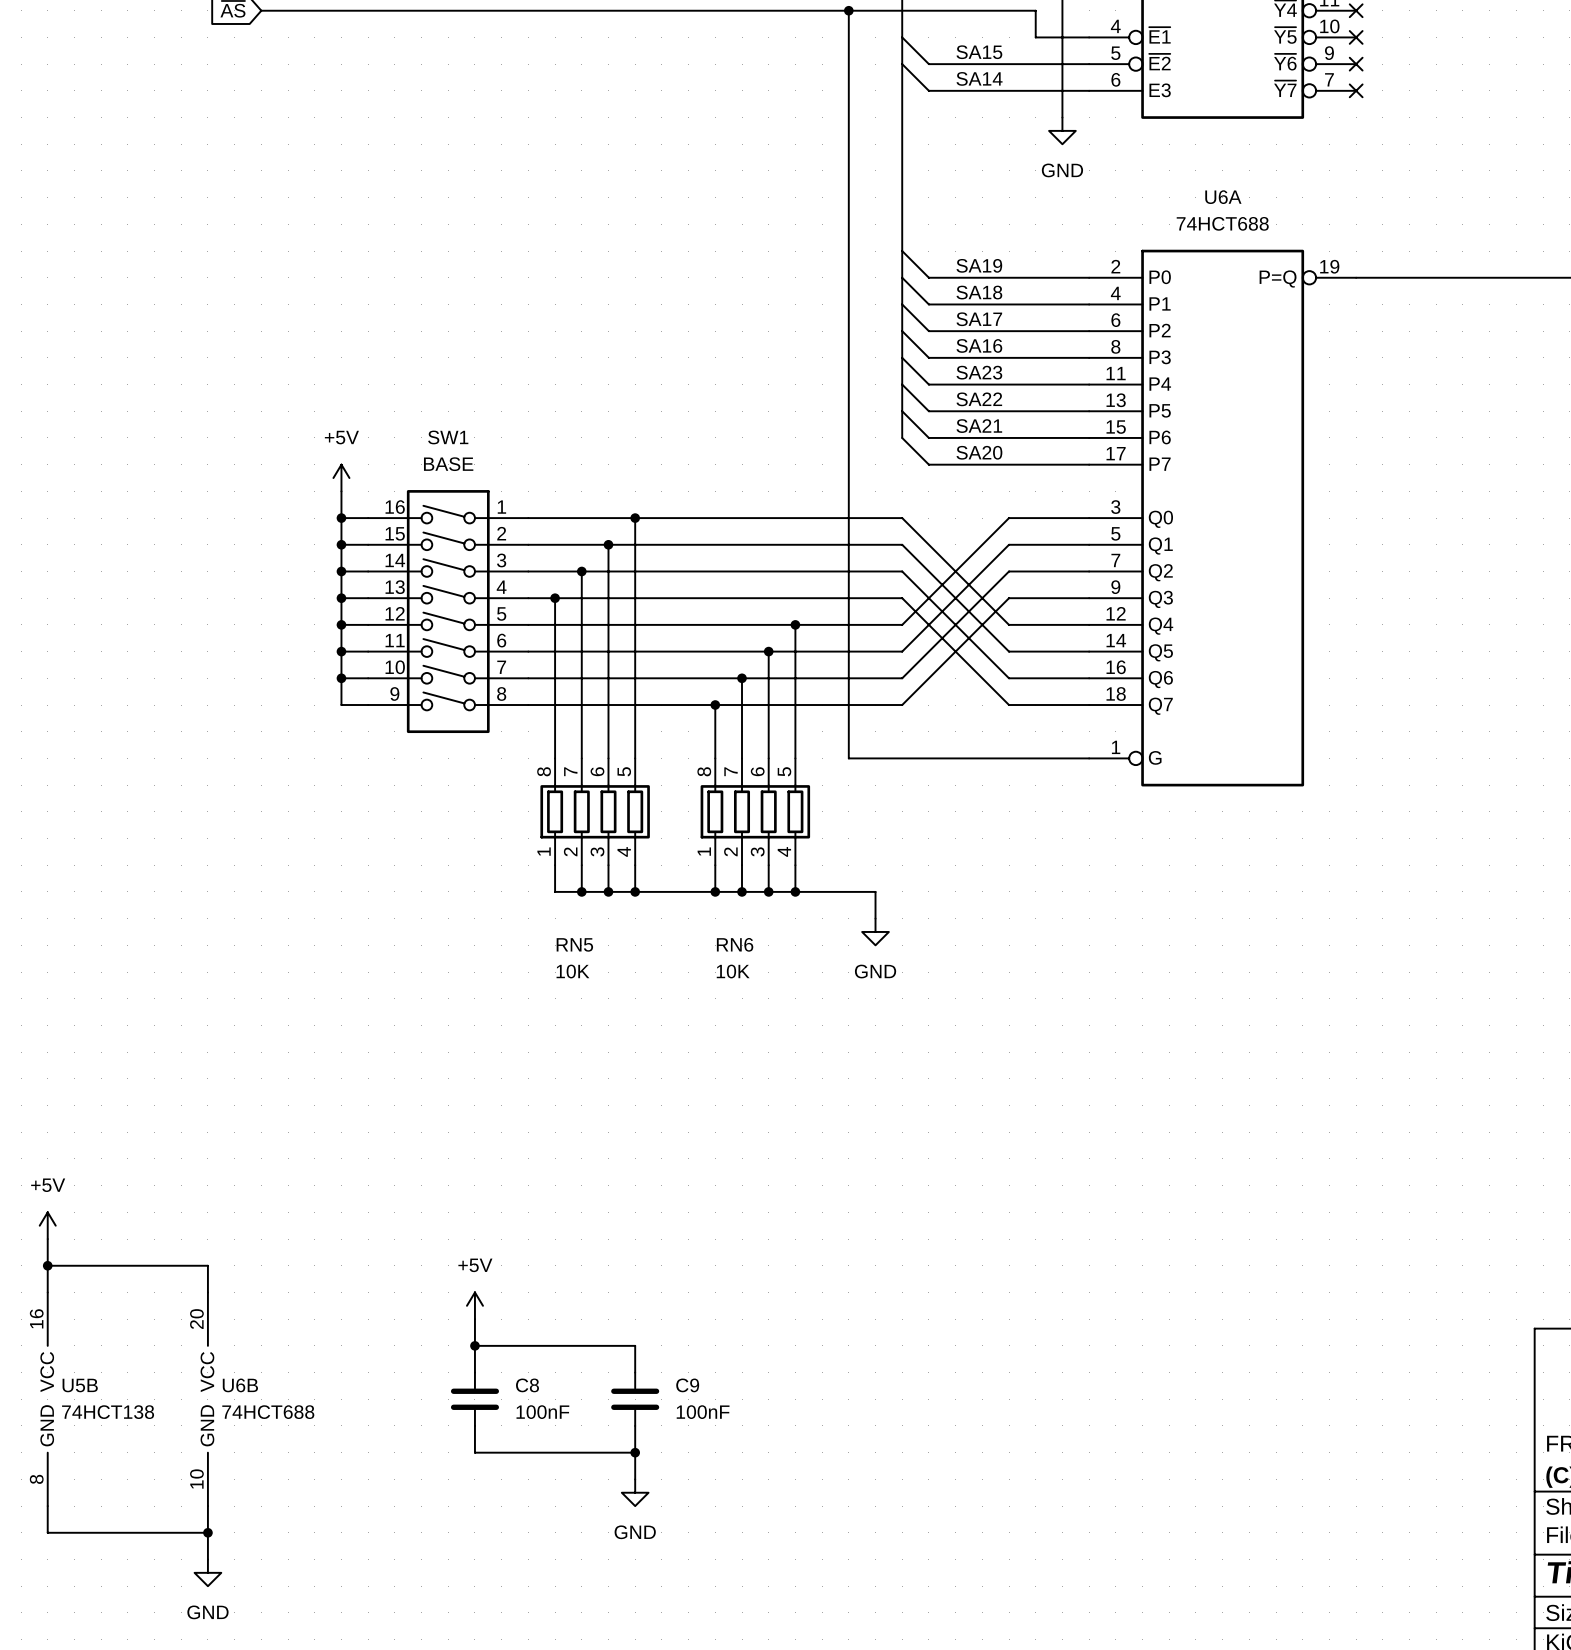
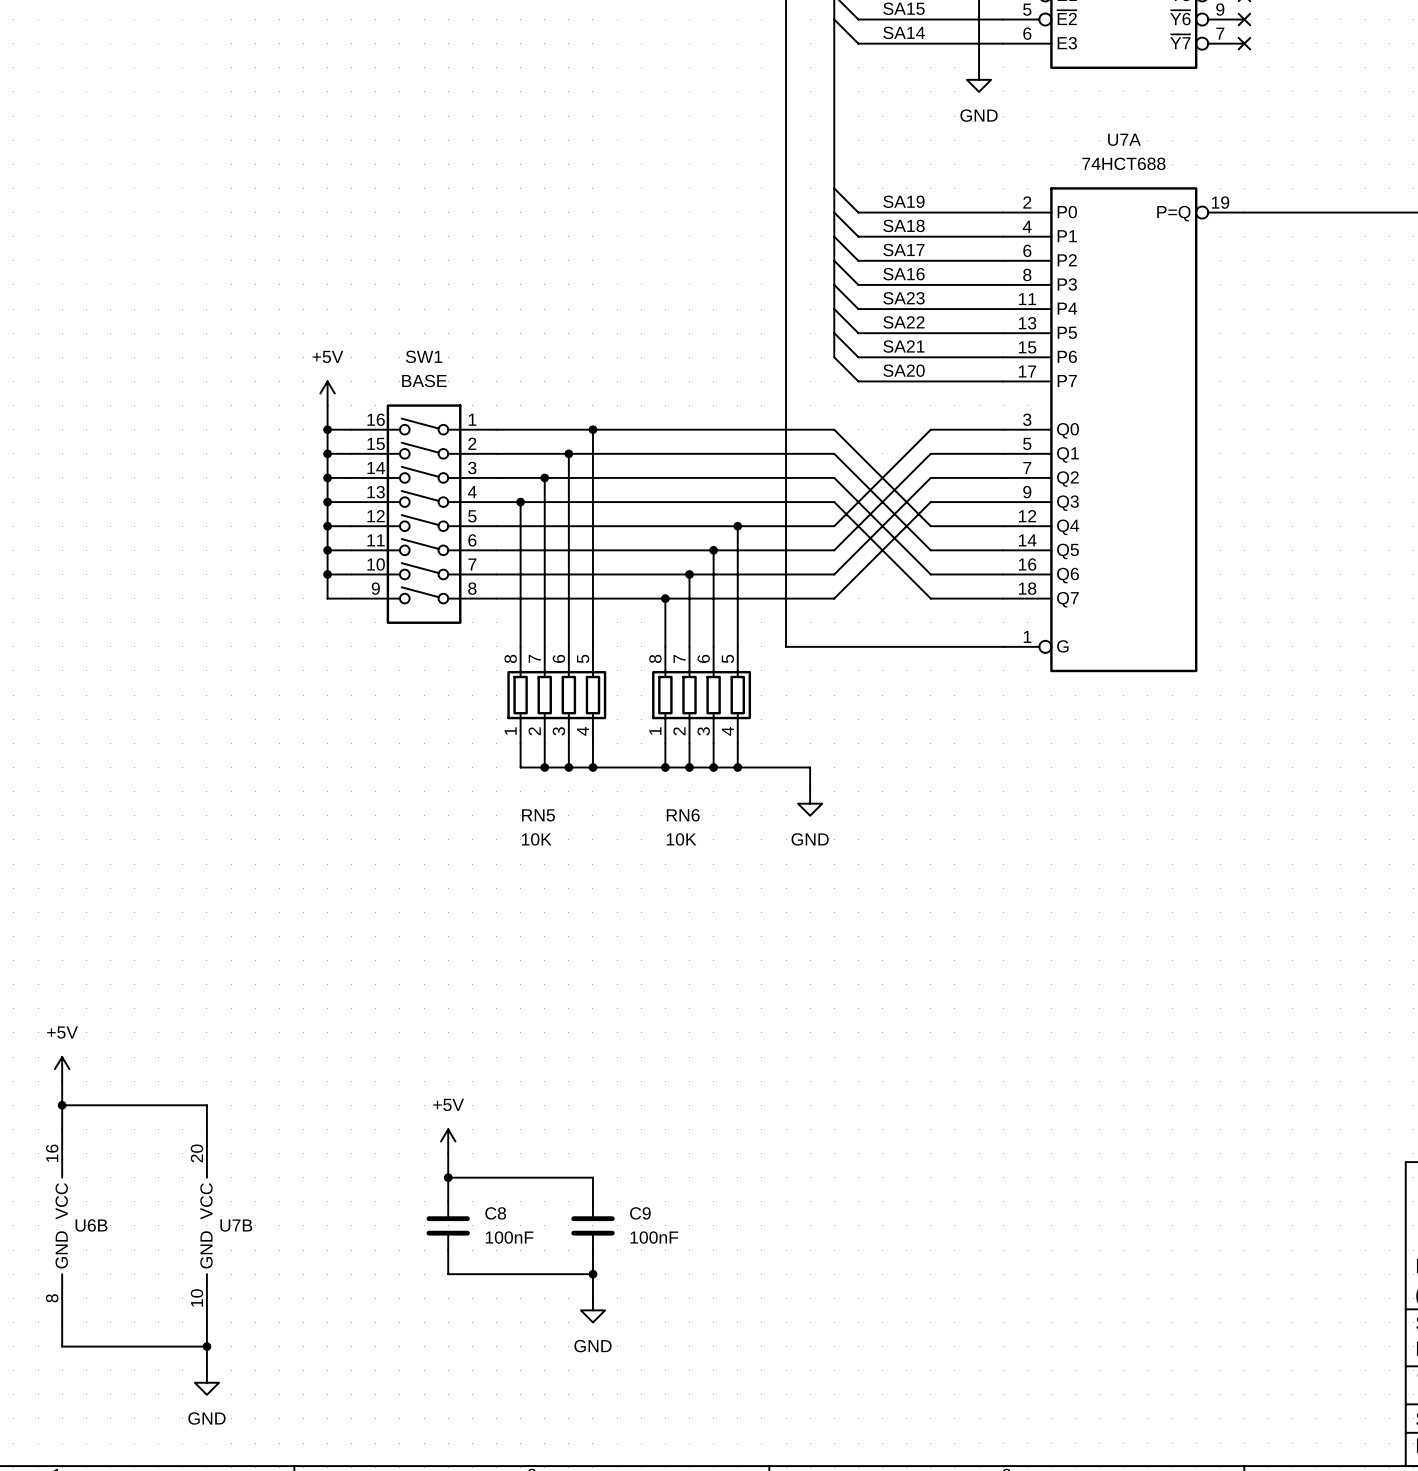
U6A name: U6A (1223, 197) -> U7A (1124, 139)
U5B name: U5B (80, 1385) -> U6B (91, 1225)
U6B name: U6B (240, 1385) -> U7B (236, 1225)
U5B value: 74HCT138 (108, 1412) -> none
U6B value: 74HCT688 (268, 1412) -> none

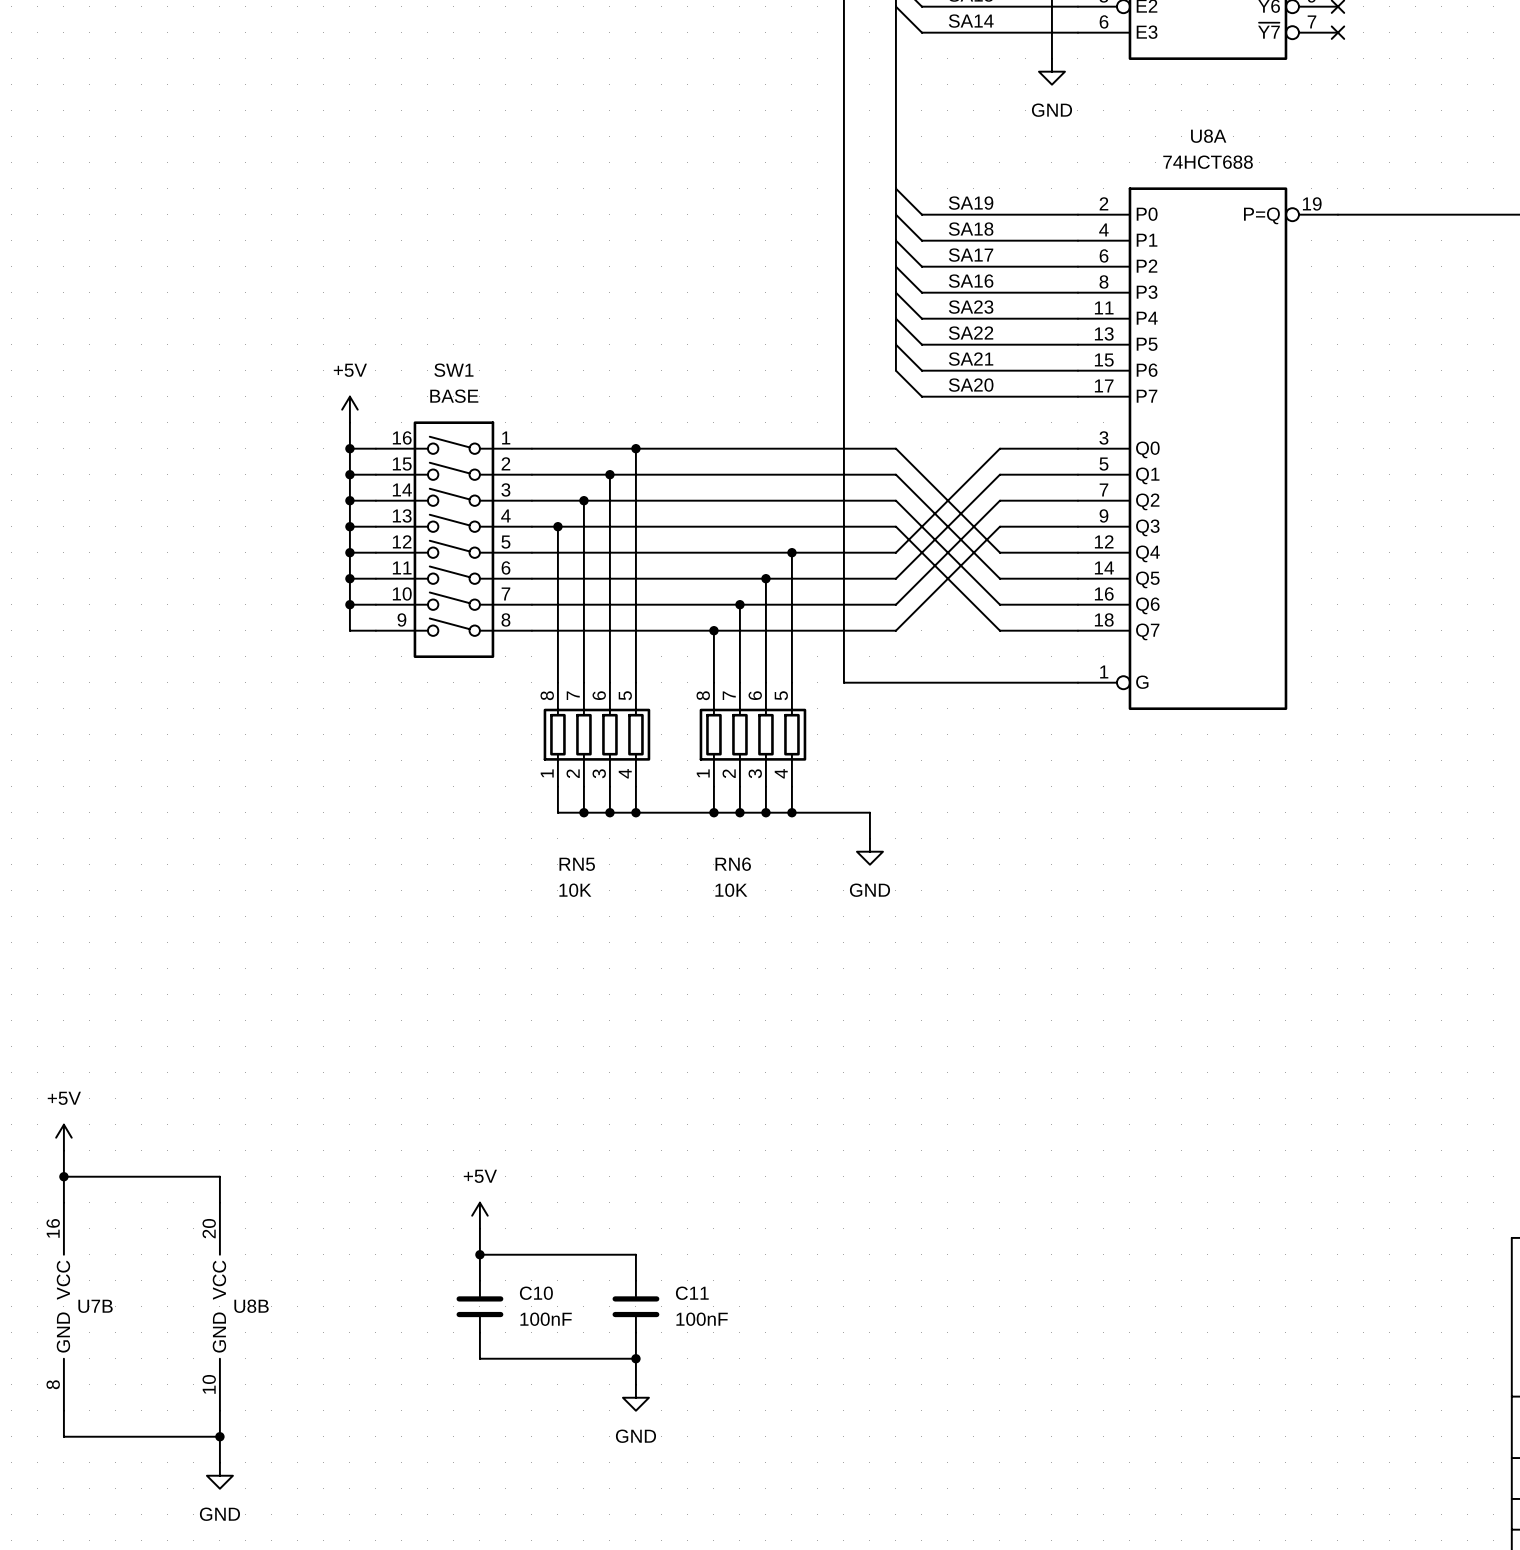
U7A name: U7A (1124, 139) -> U8A (1208, 136)
C8 name: C8 (495, 1213) -> C10 (536, 1293)
C9 name: C9 (640, 1213) -> C11 (692, 1293)
U6B name: U6B (91, 1225) -> U7B (95, 1306)
U7B name: U7B (236, 1225) -> U8B (251, 1306)

